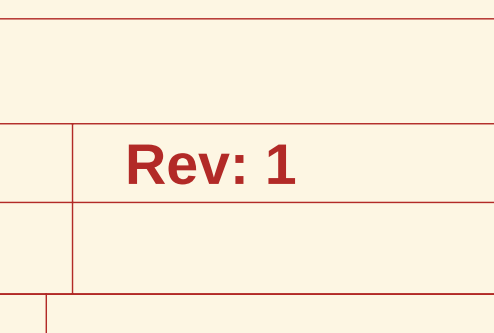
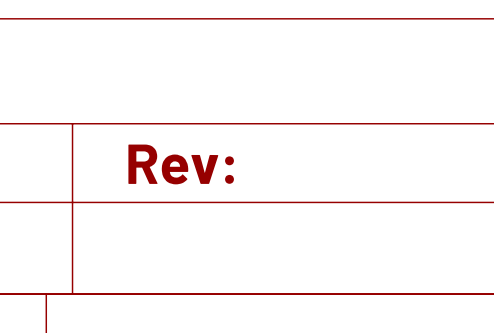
title block: Rev: 1 (211, 164) -> Rev: (181, 164)

